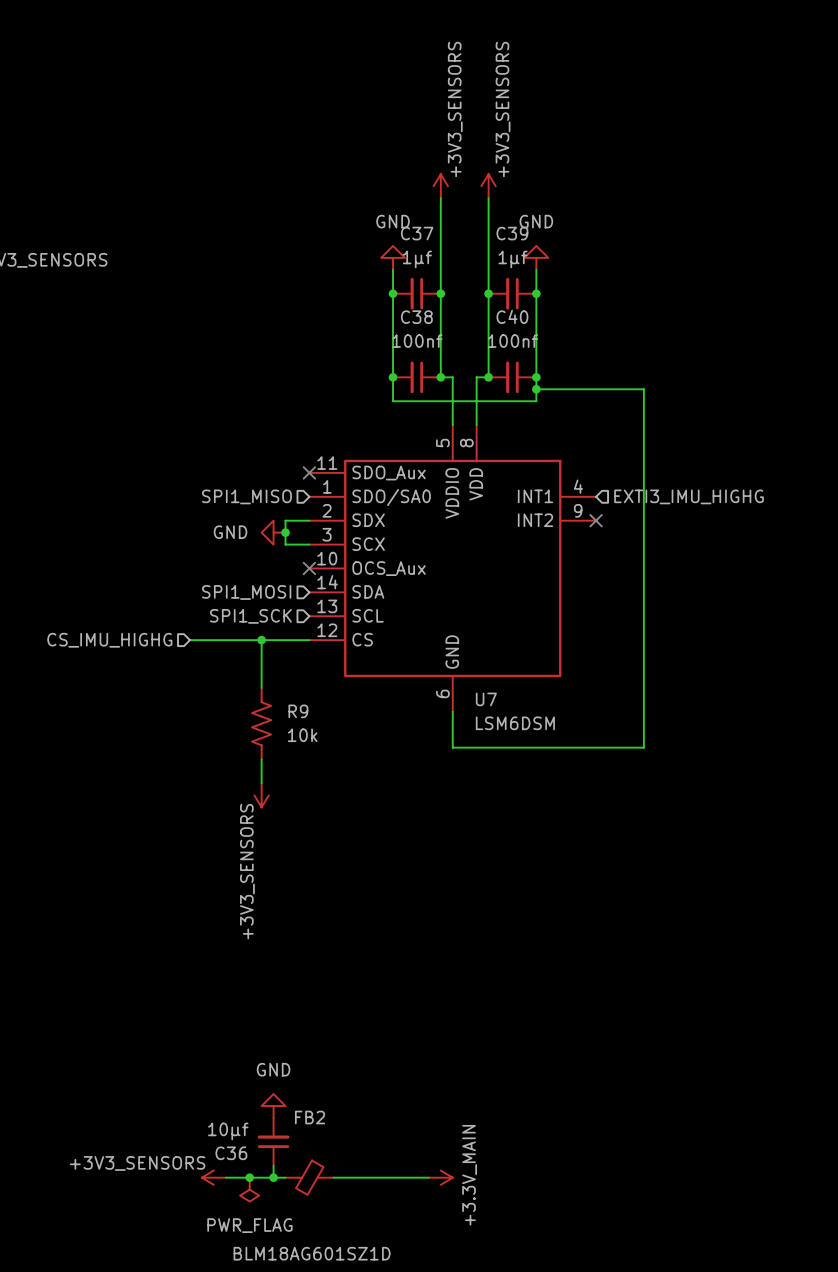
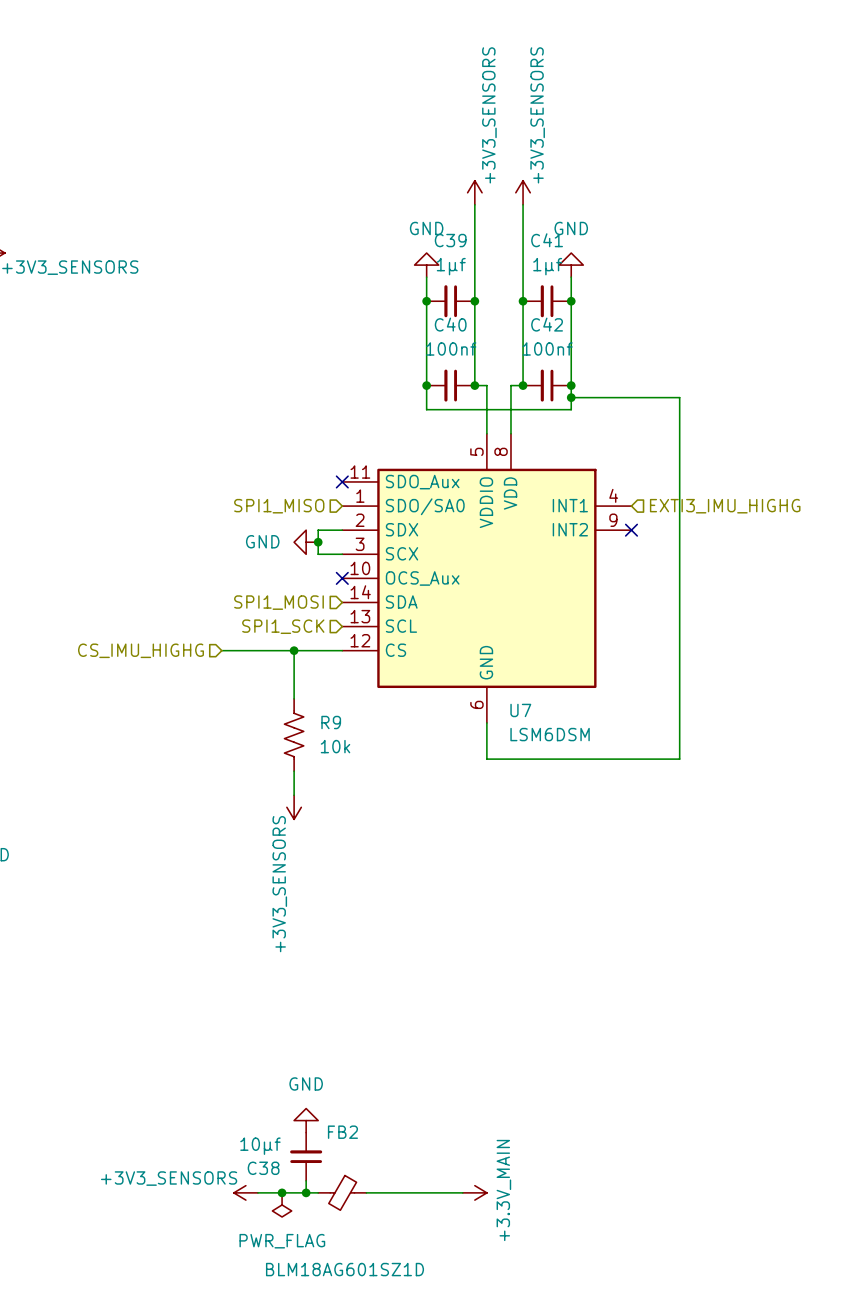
C37 name: C37 (417, 233) -> C39 (450, 240)
C39 name: C39 (512, 233) -> C41 (547, 240)
C40 name: C40 (512, 316) -> C42 (547, 324)
C38 name: C38 (416, 317) -> C40 (450, 324)
C36 name: C36 (231, 1153) -> C38 (263, 1168)

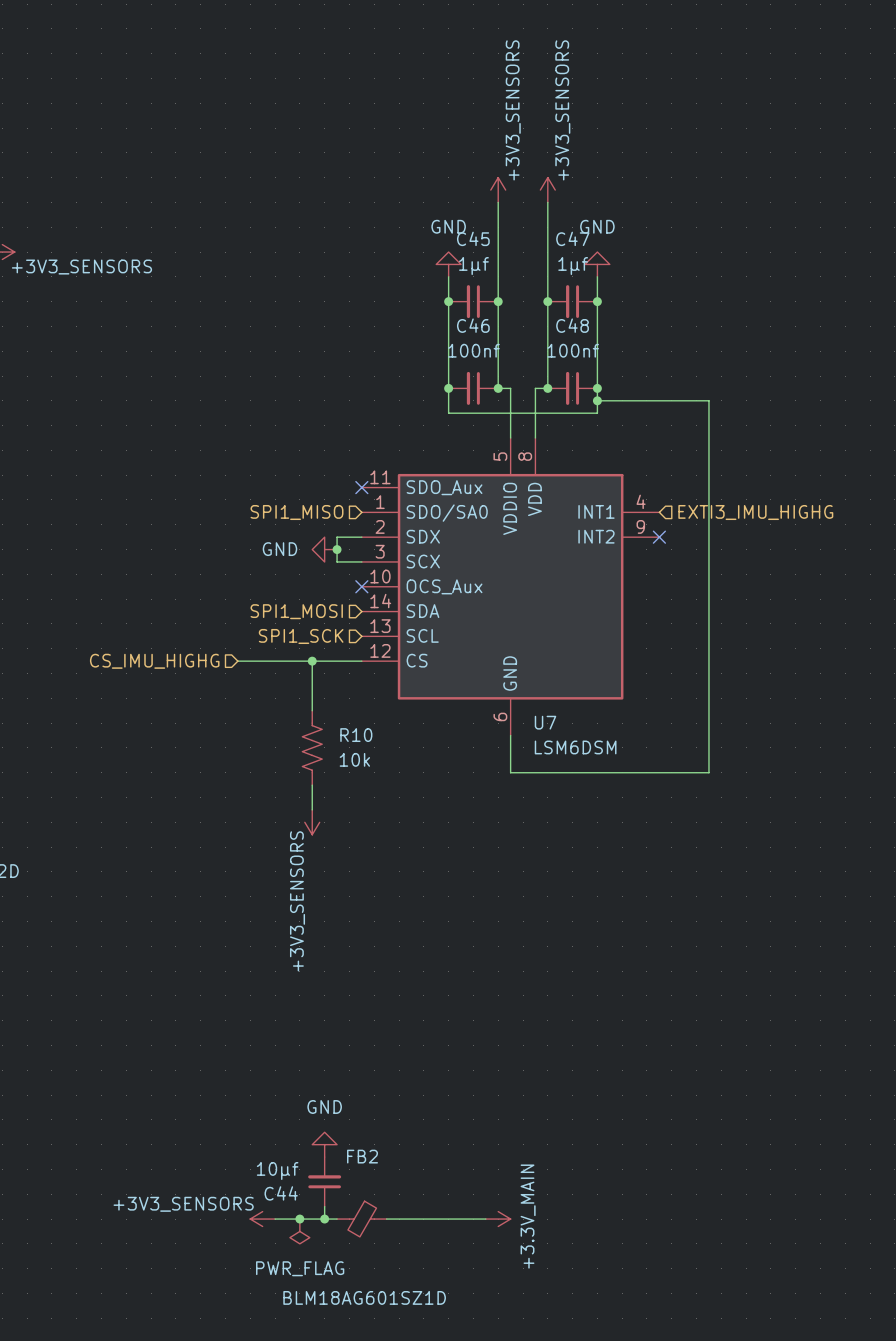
C39 name: C39 (450, 240) -> C45 (473, 238)
C41 name: C41 (547, 240) -> C47 (572, 238)
C40 name: C40 (450, 324) -> C46 (473, 325)
C42 name: C42 (547, 324) -> C48 (572, 325)
R9 name: R9 (331, 722) -> R10 (356, 735)
C38 name: C38 (263, 1168) -> C44 (281, 1193)

